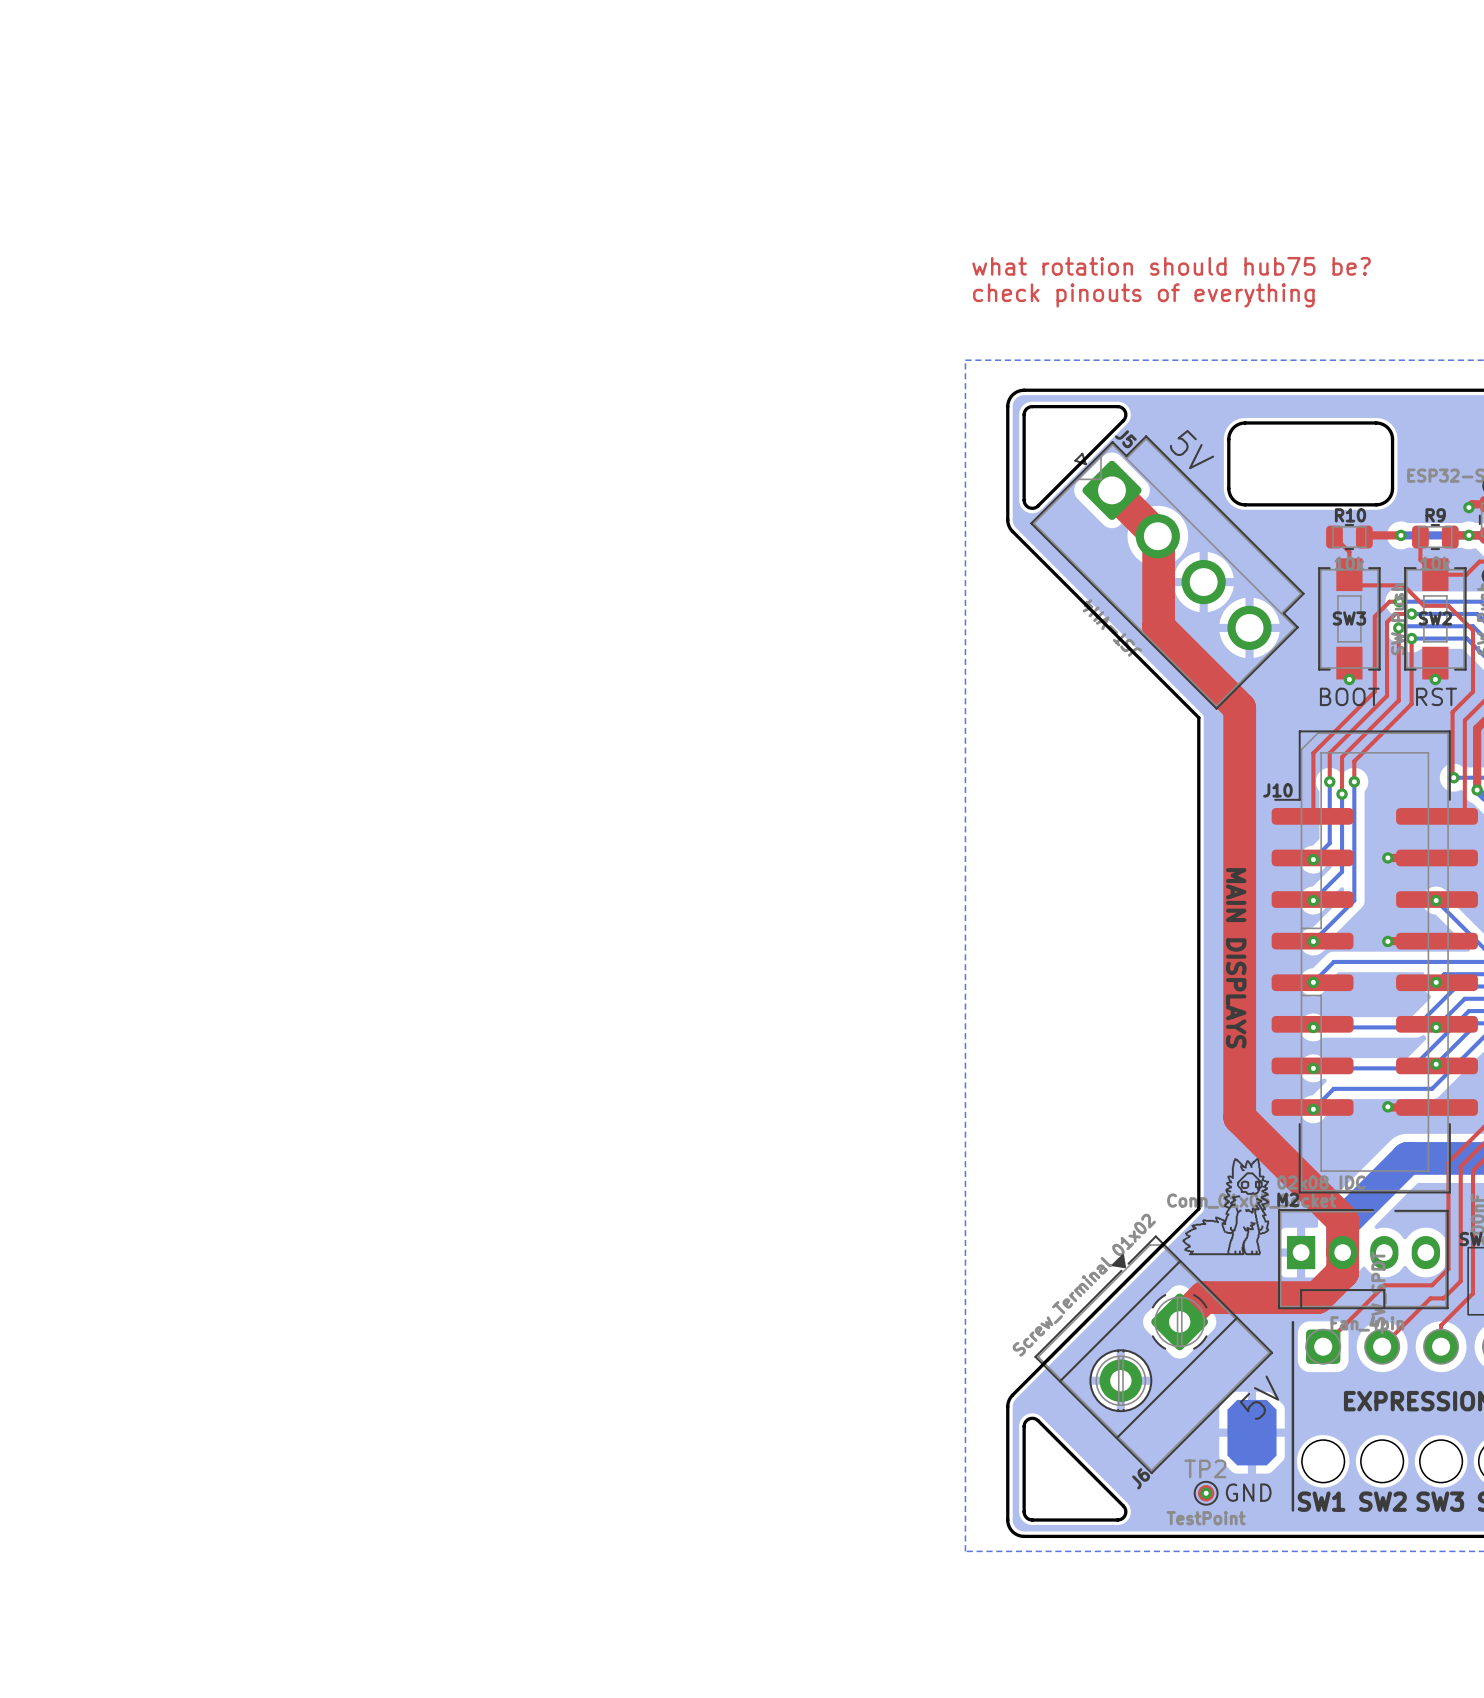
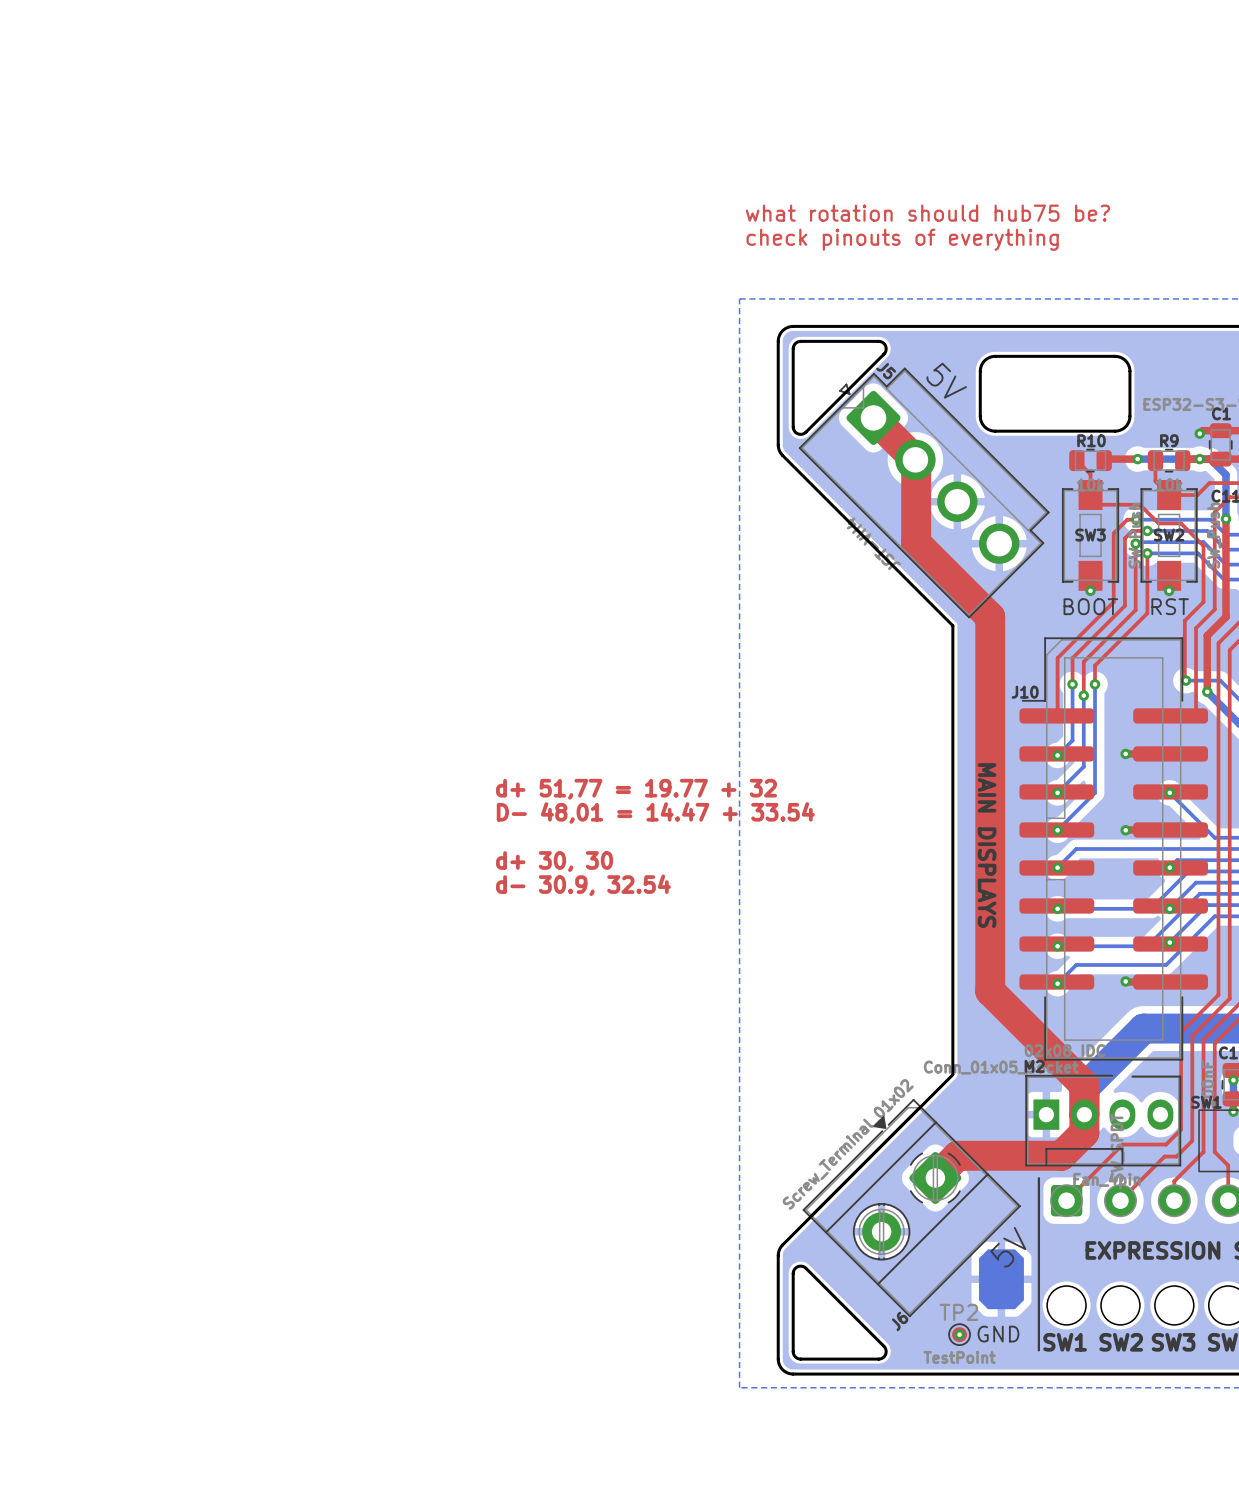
text: none -> d+ 51,77 = 19.77 + 32 (636, 789)
text: none -> D- 48,01 = 14.47 + 33.54 (655, 812)
text: none -> d+ 30, 30 (554, 861)
text: none -> d- 30.9, 32.54 (583, 885)
drawing: [1182, 1158, 1270, 1256] -> none

